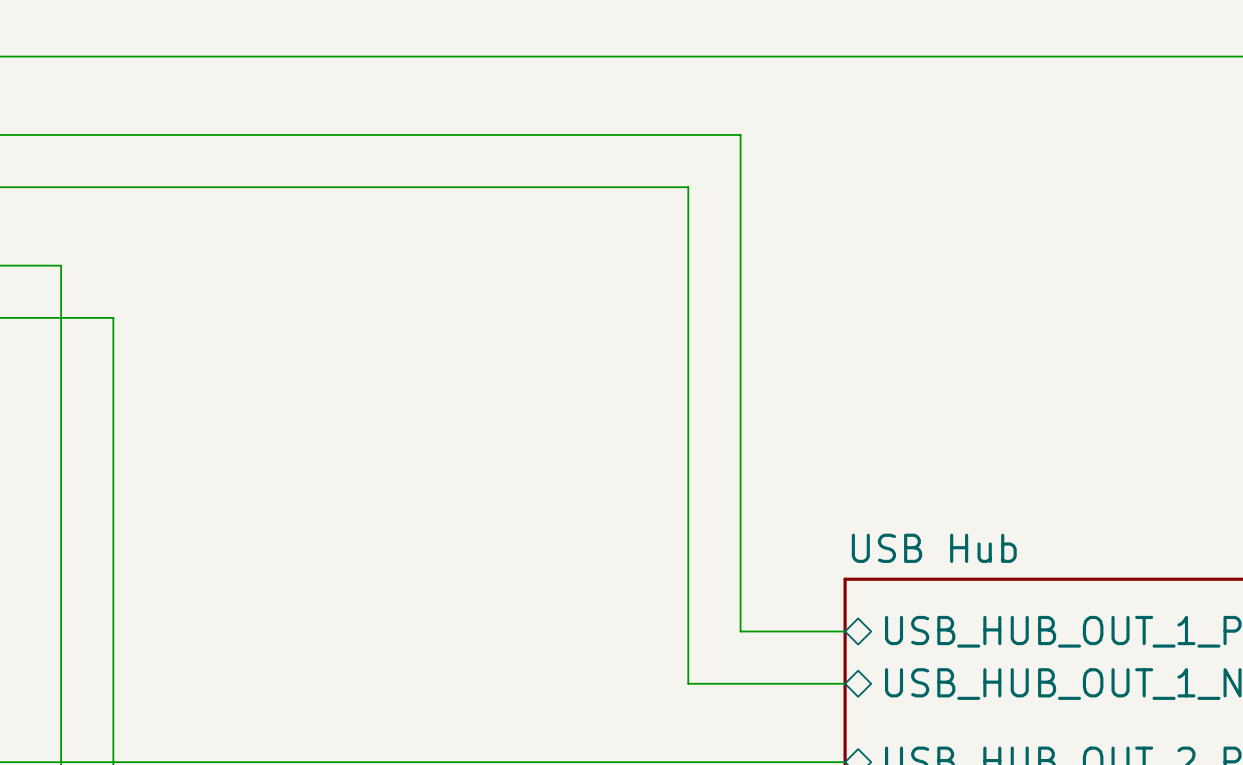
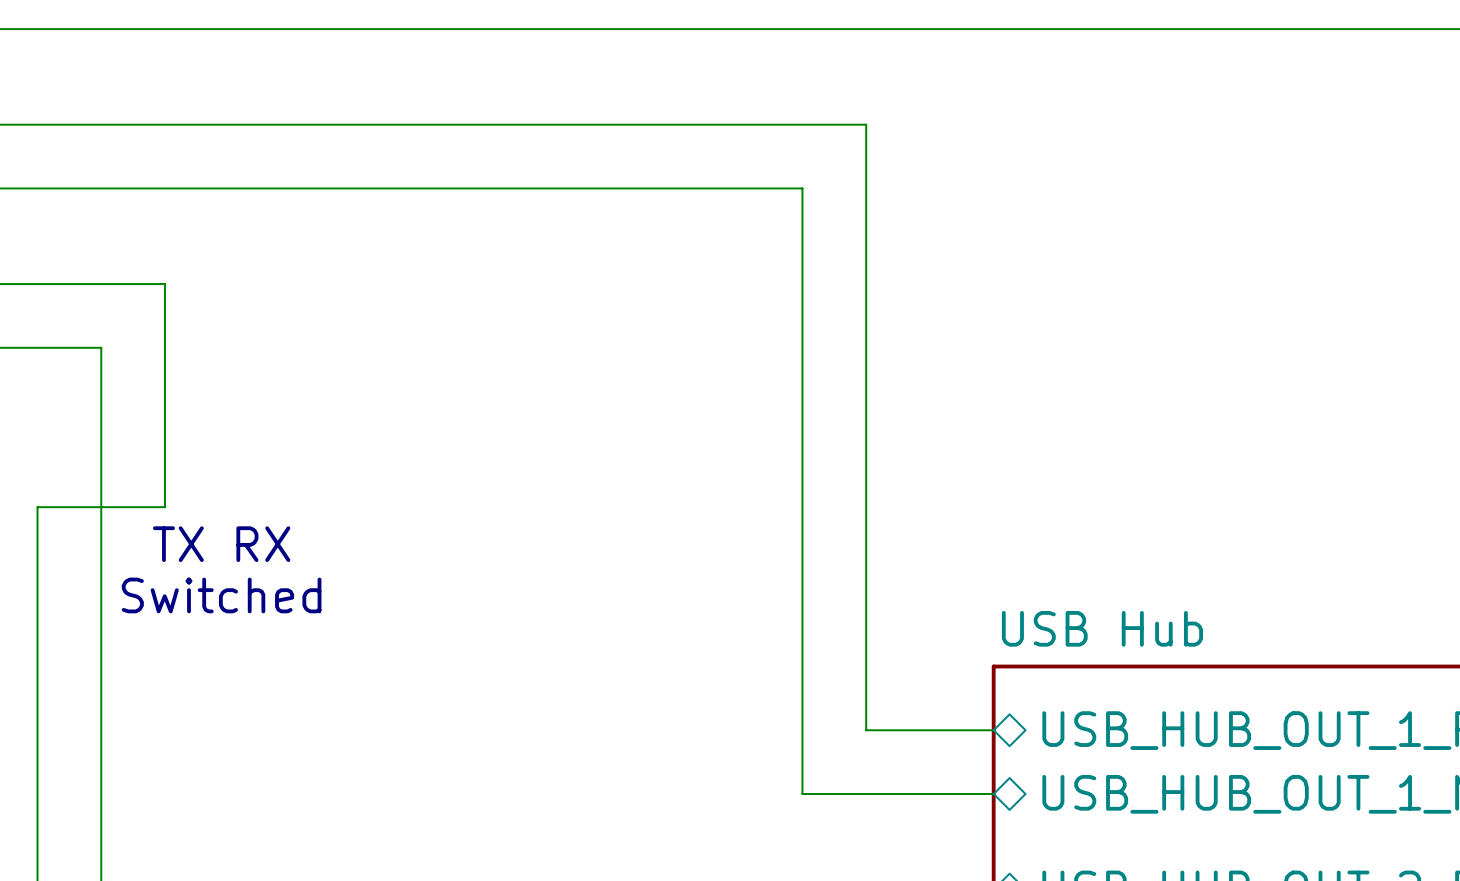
wire: (61, 265) (61, 448) -> (37, 284) (165, 284) (165, 507) (37, 507)
text: none -> TX RX (221, 544)
text: none -> Switched (221, 595)

